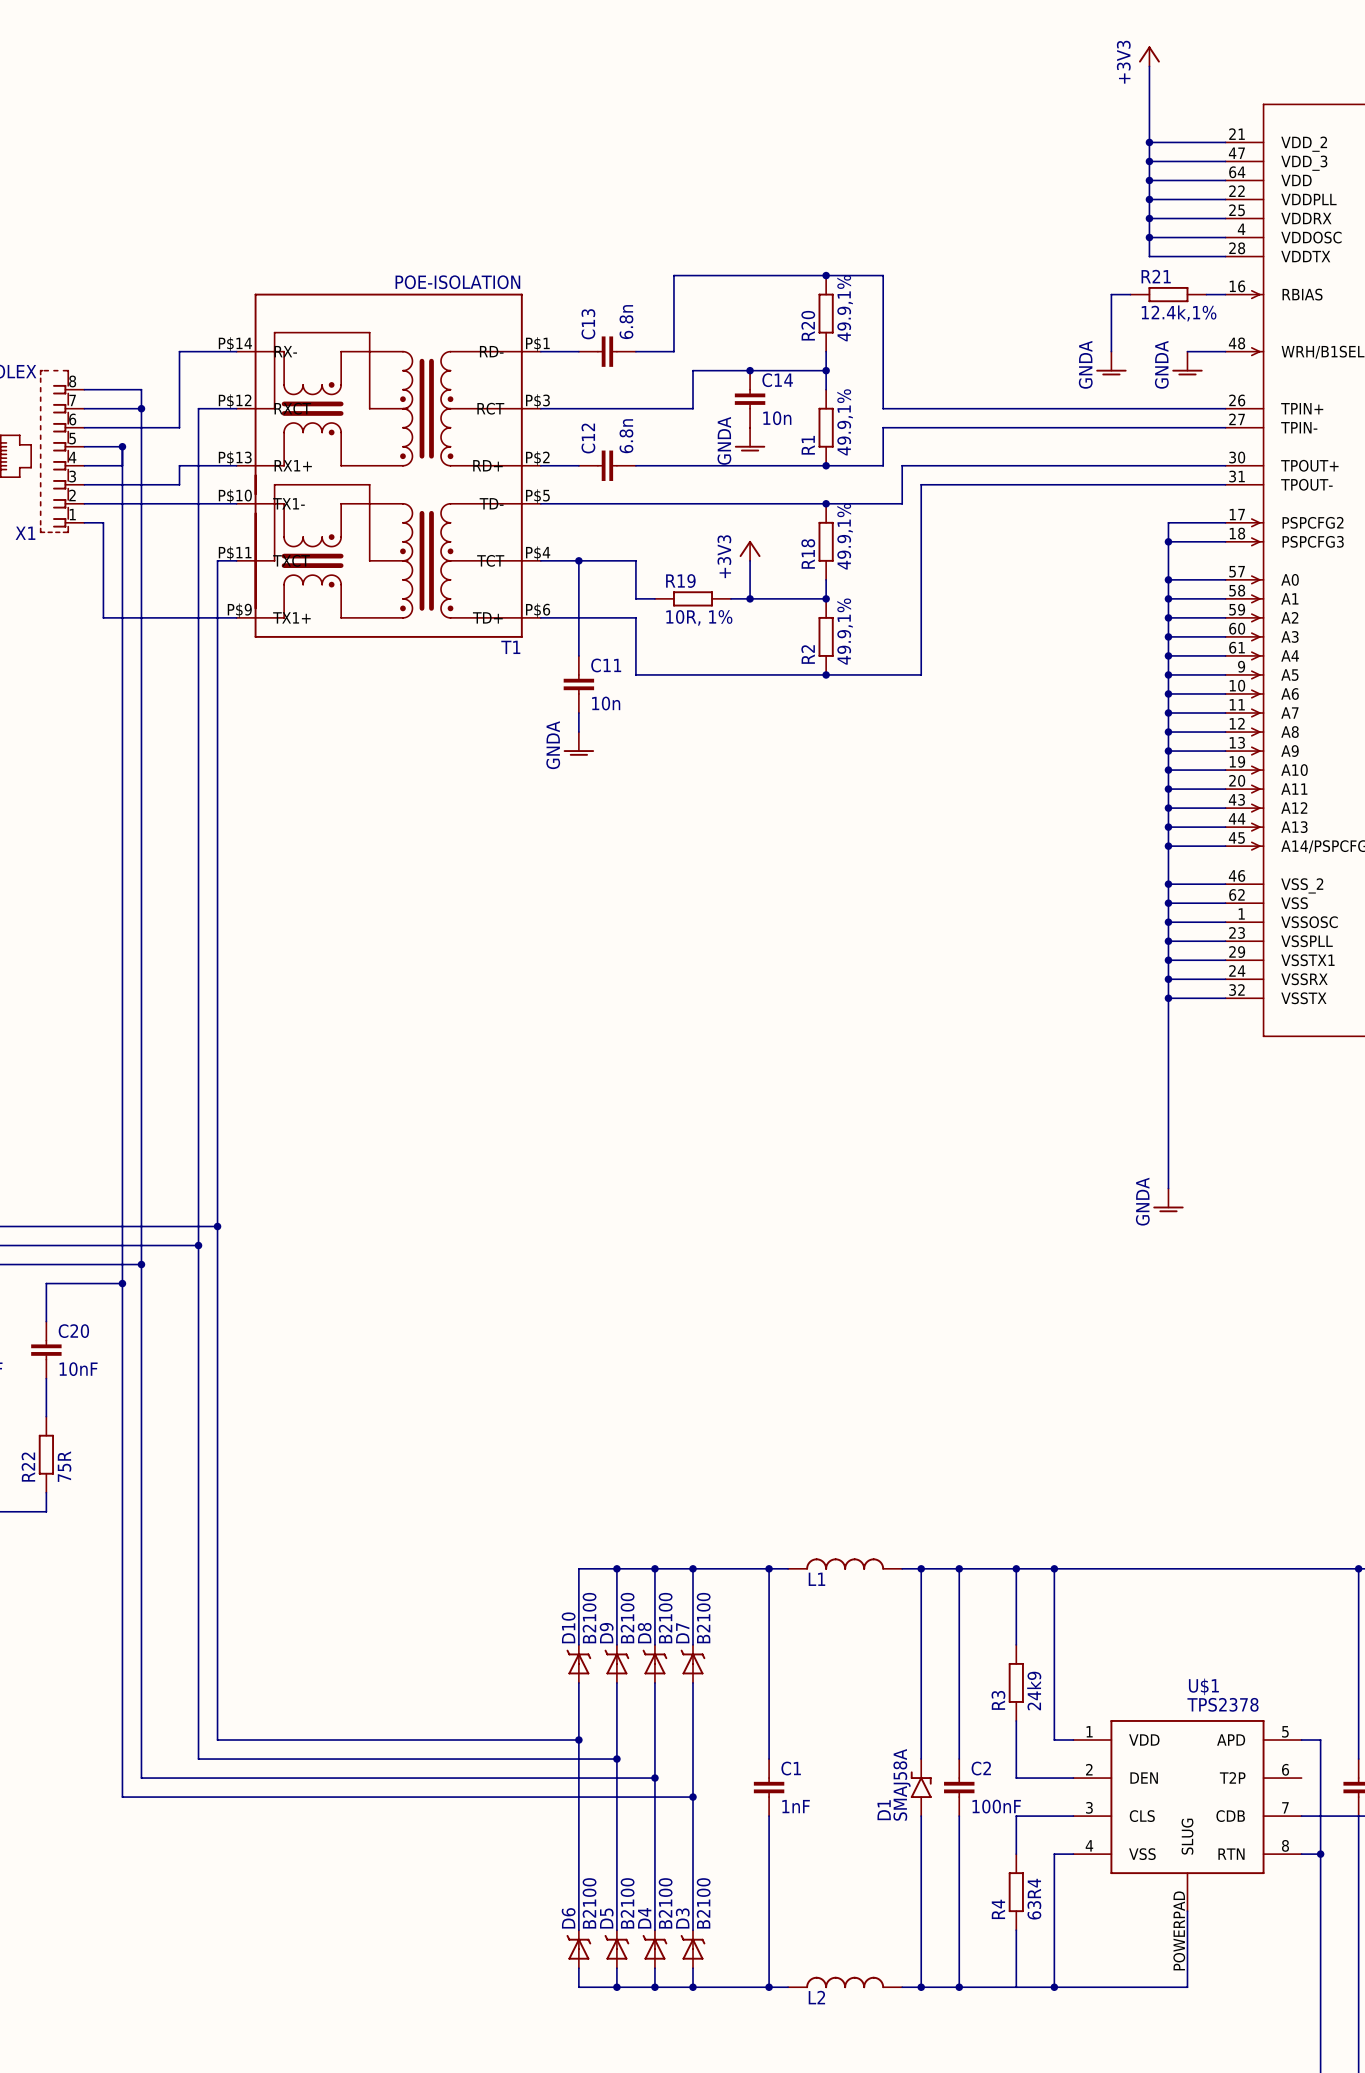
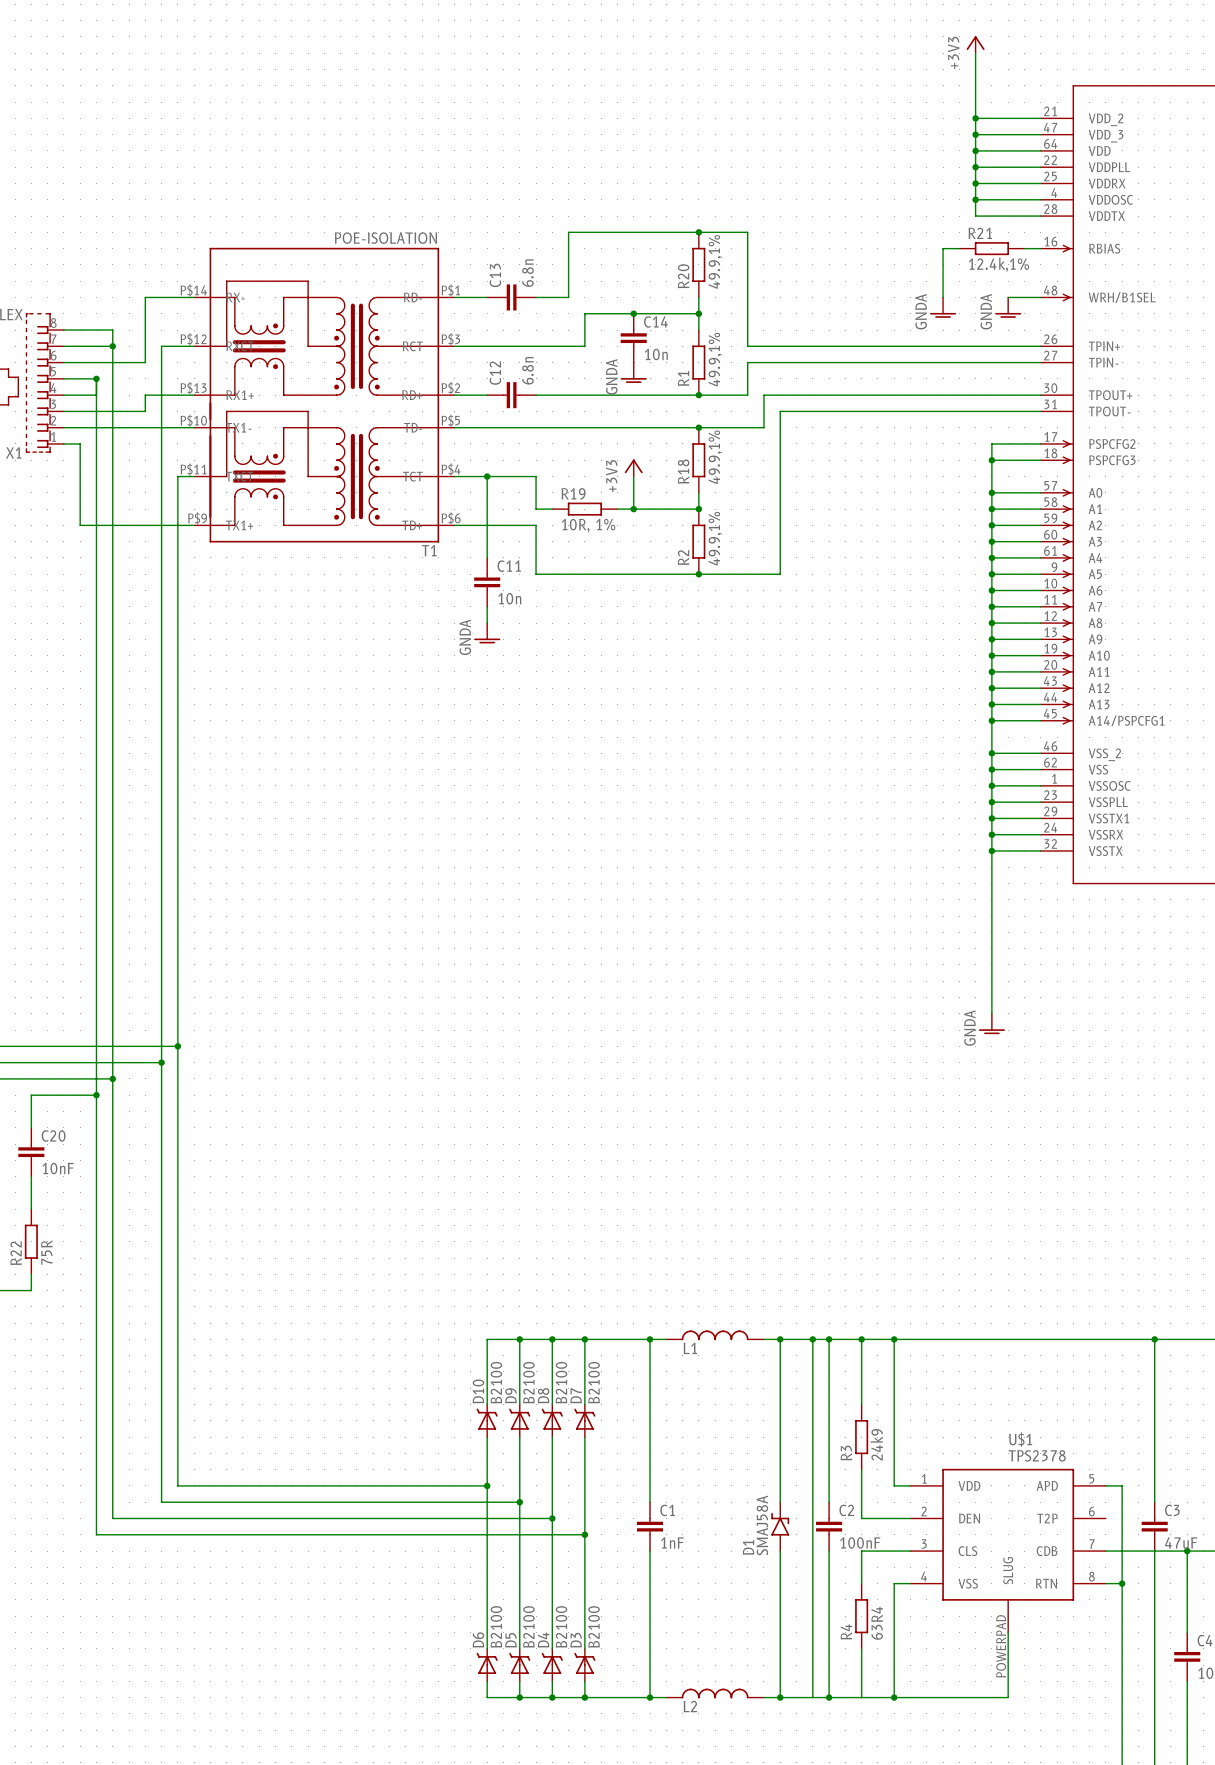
wire: none -> (829, 1339) (829, 1502)
junction: none -> (829, 1339)
C2 position: (959, 1787) -> (829, 1526)
wire: none -> (829, 1551) (829, 1697)
junction position: (959, 1987) -> (829, 1697)

